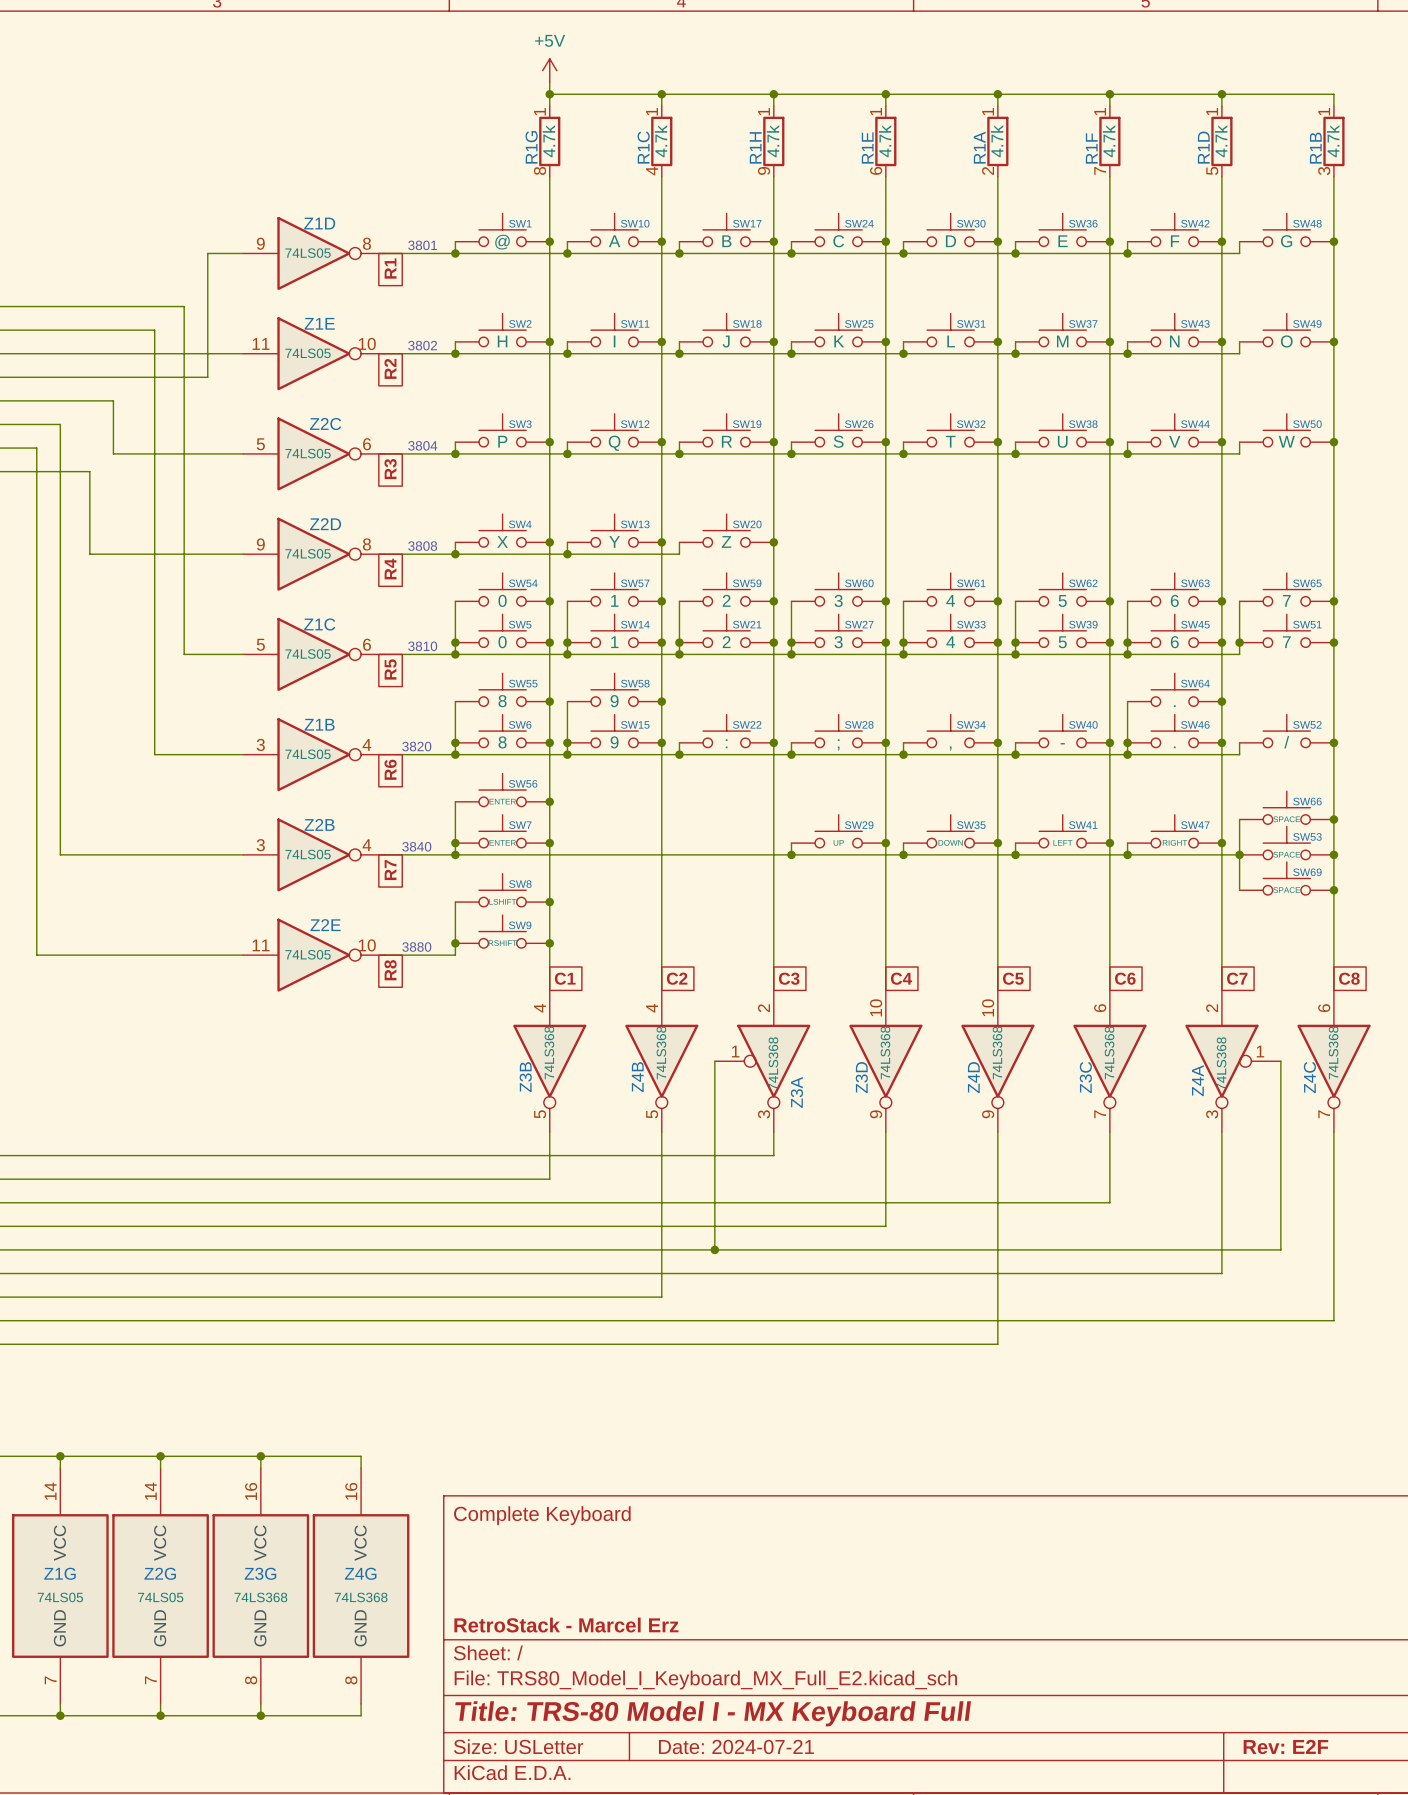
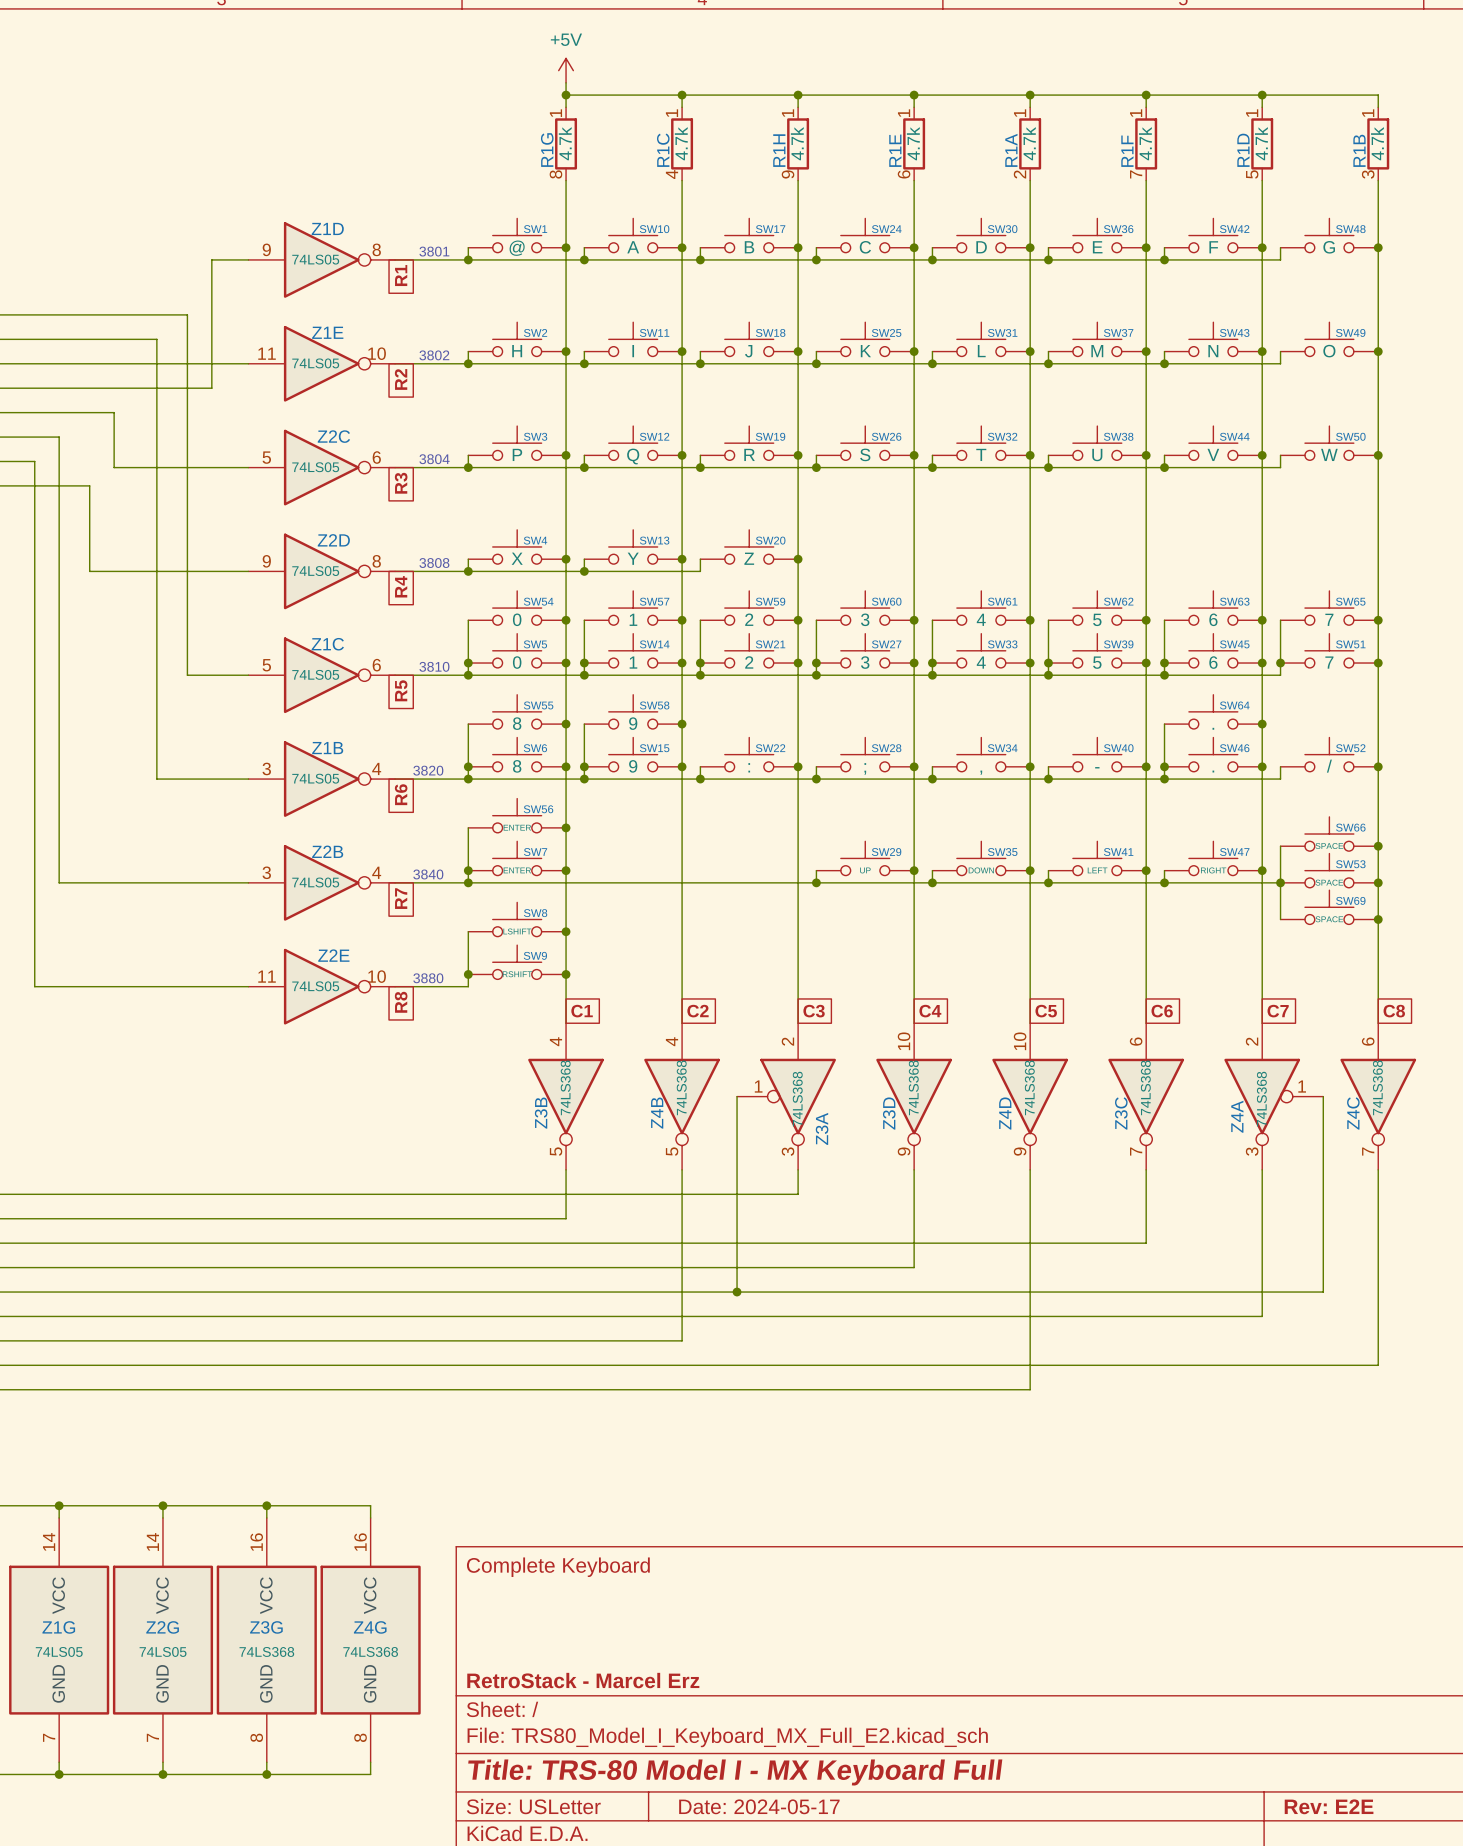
title block: Date: 2024-07-21 (736, 1746) -> Date: 2024-05-17 (759, 1806)
title block: Rev: E2F (1285, 1746) -> Rev: E2E (1329, 1806)

